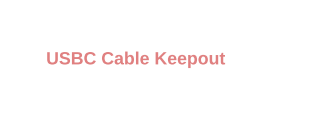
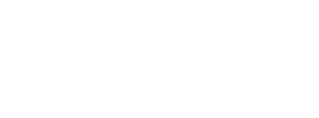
text: USBC Cable Keepout (136, 59) -> none

